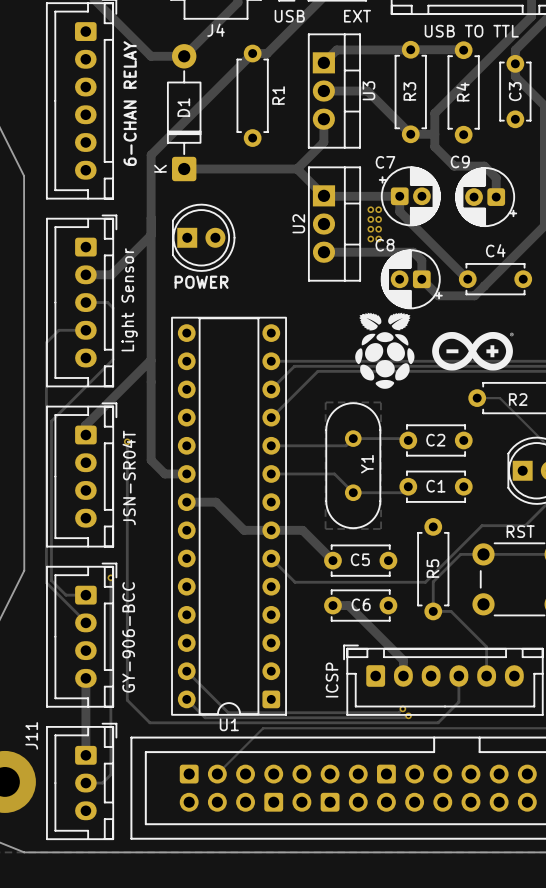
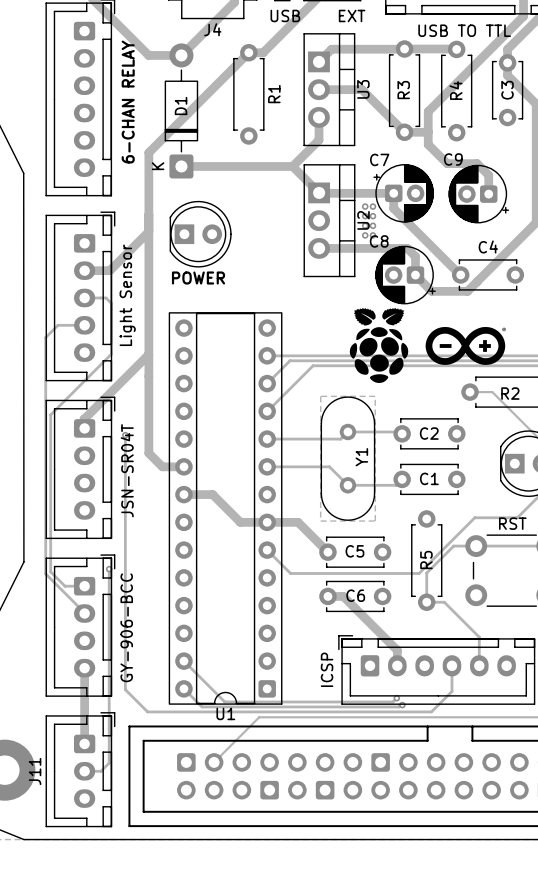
U2 name position: U2 (298, 223) -> U2 (363, 220)
J11 name position: J11 (31, 735) -> J11 (35, 771)

